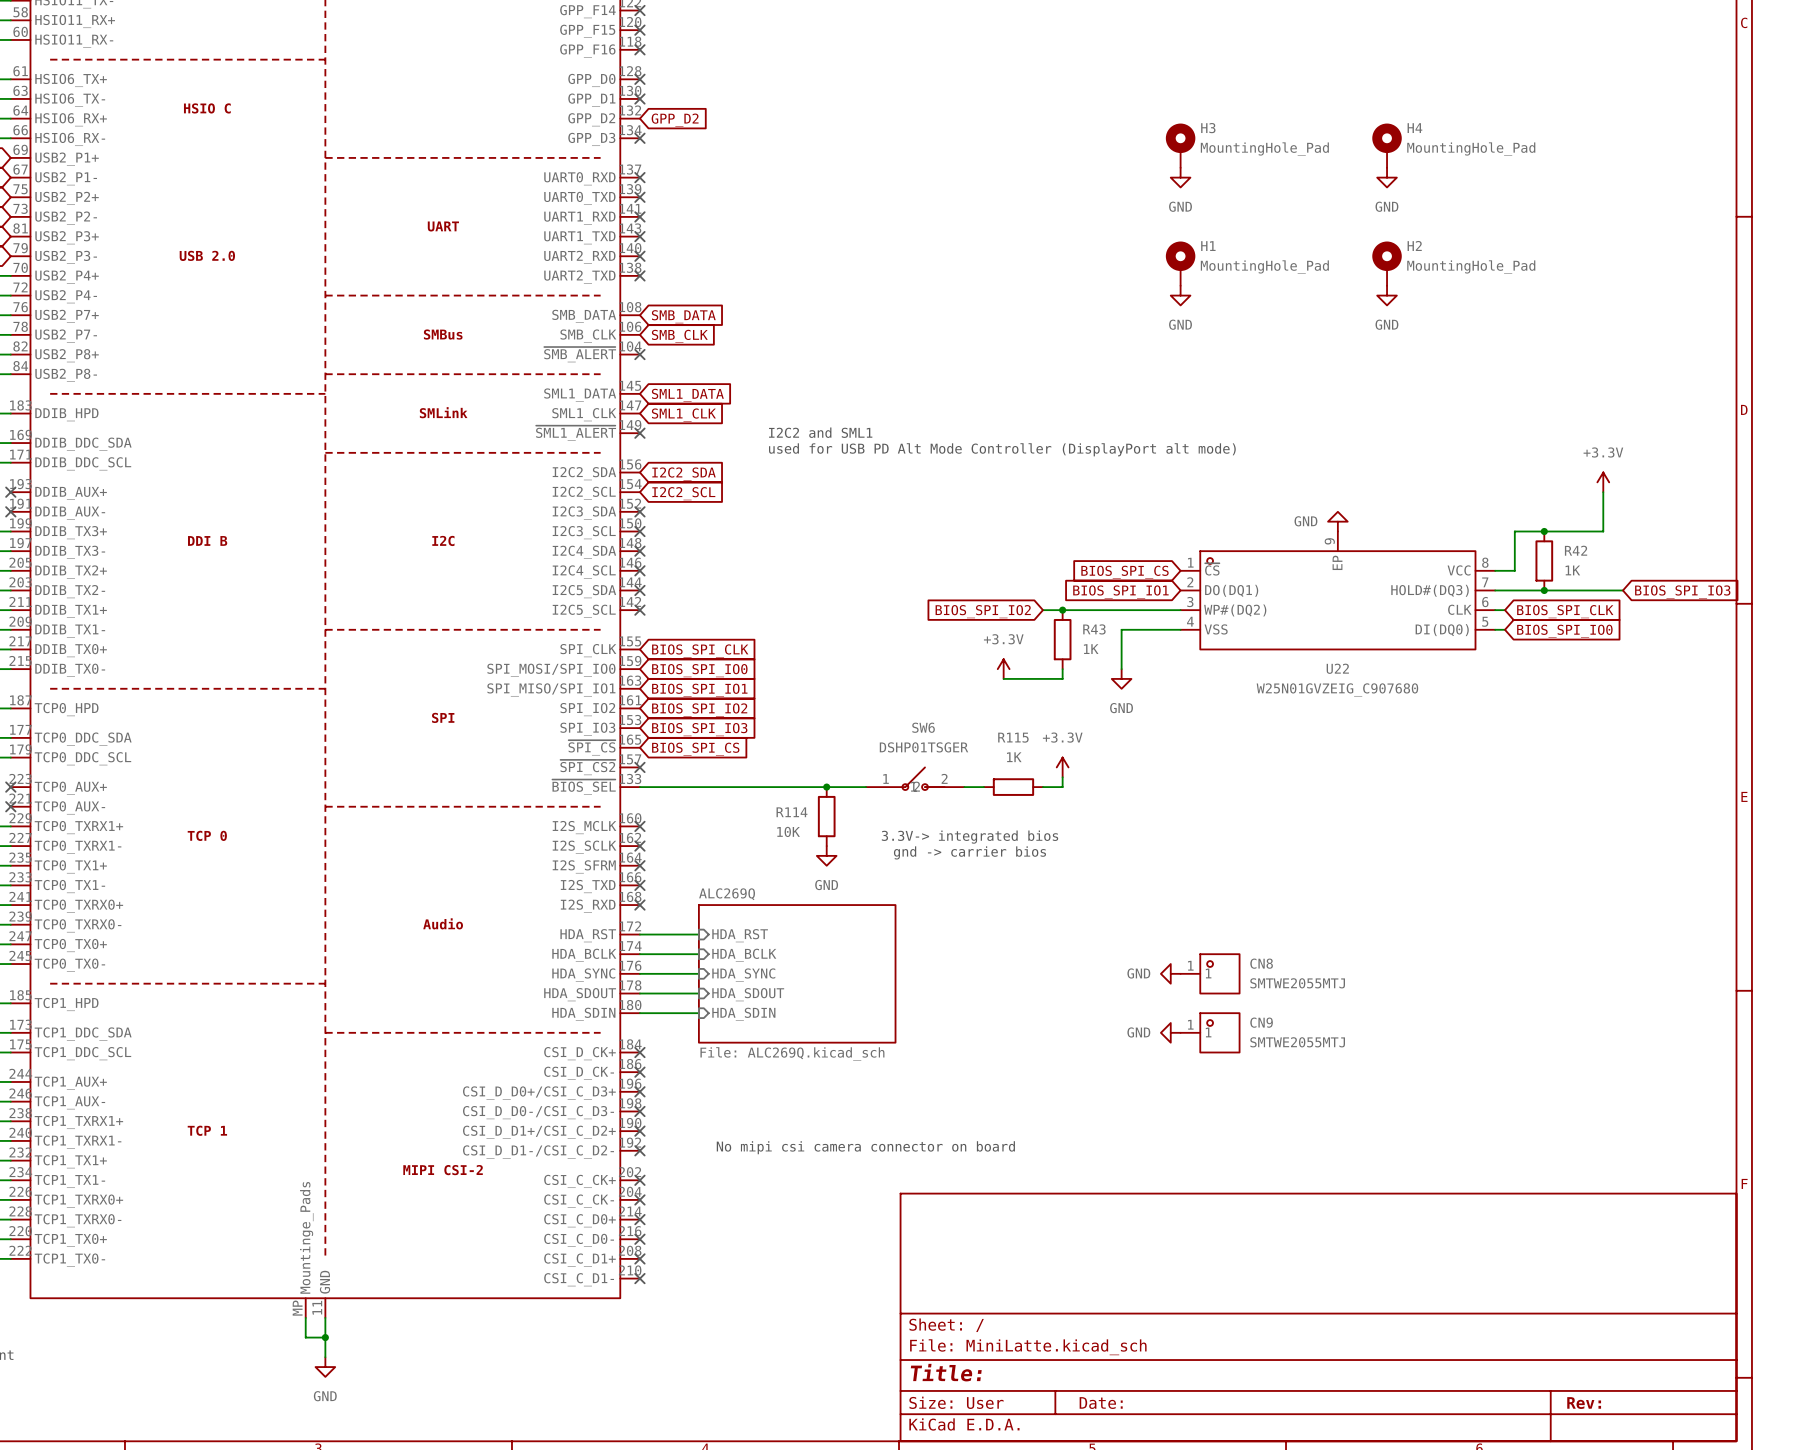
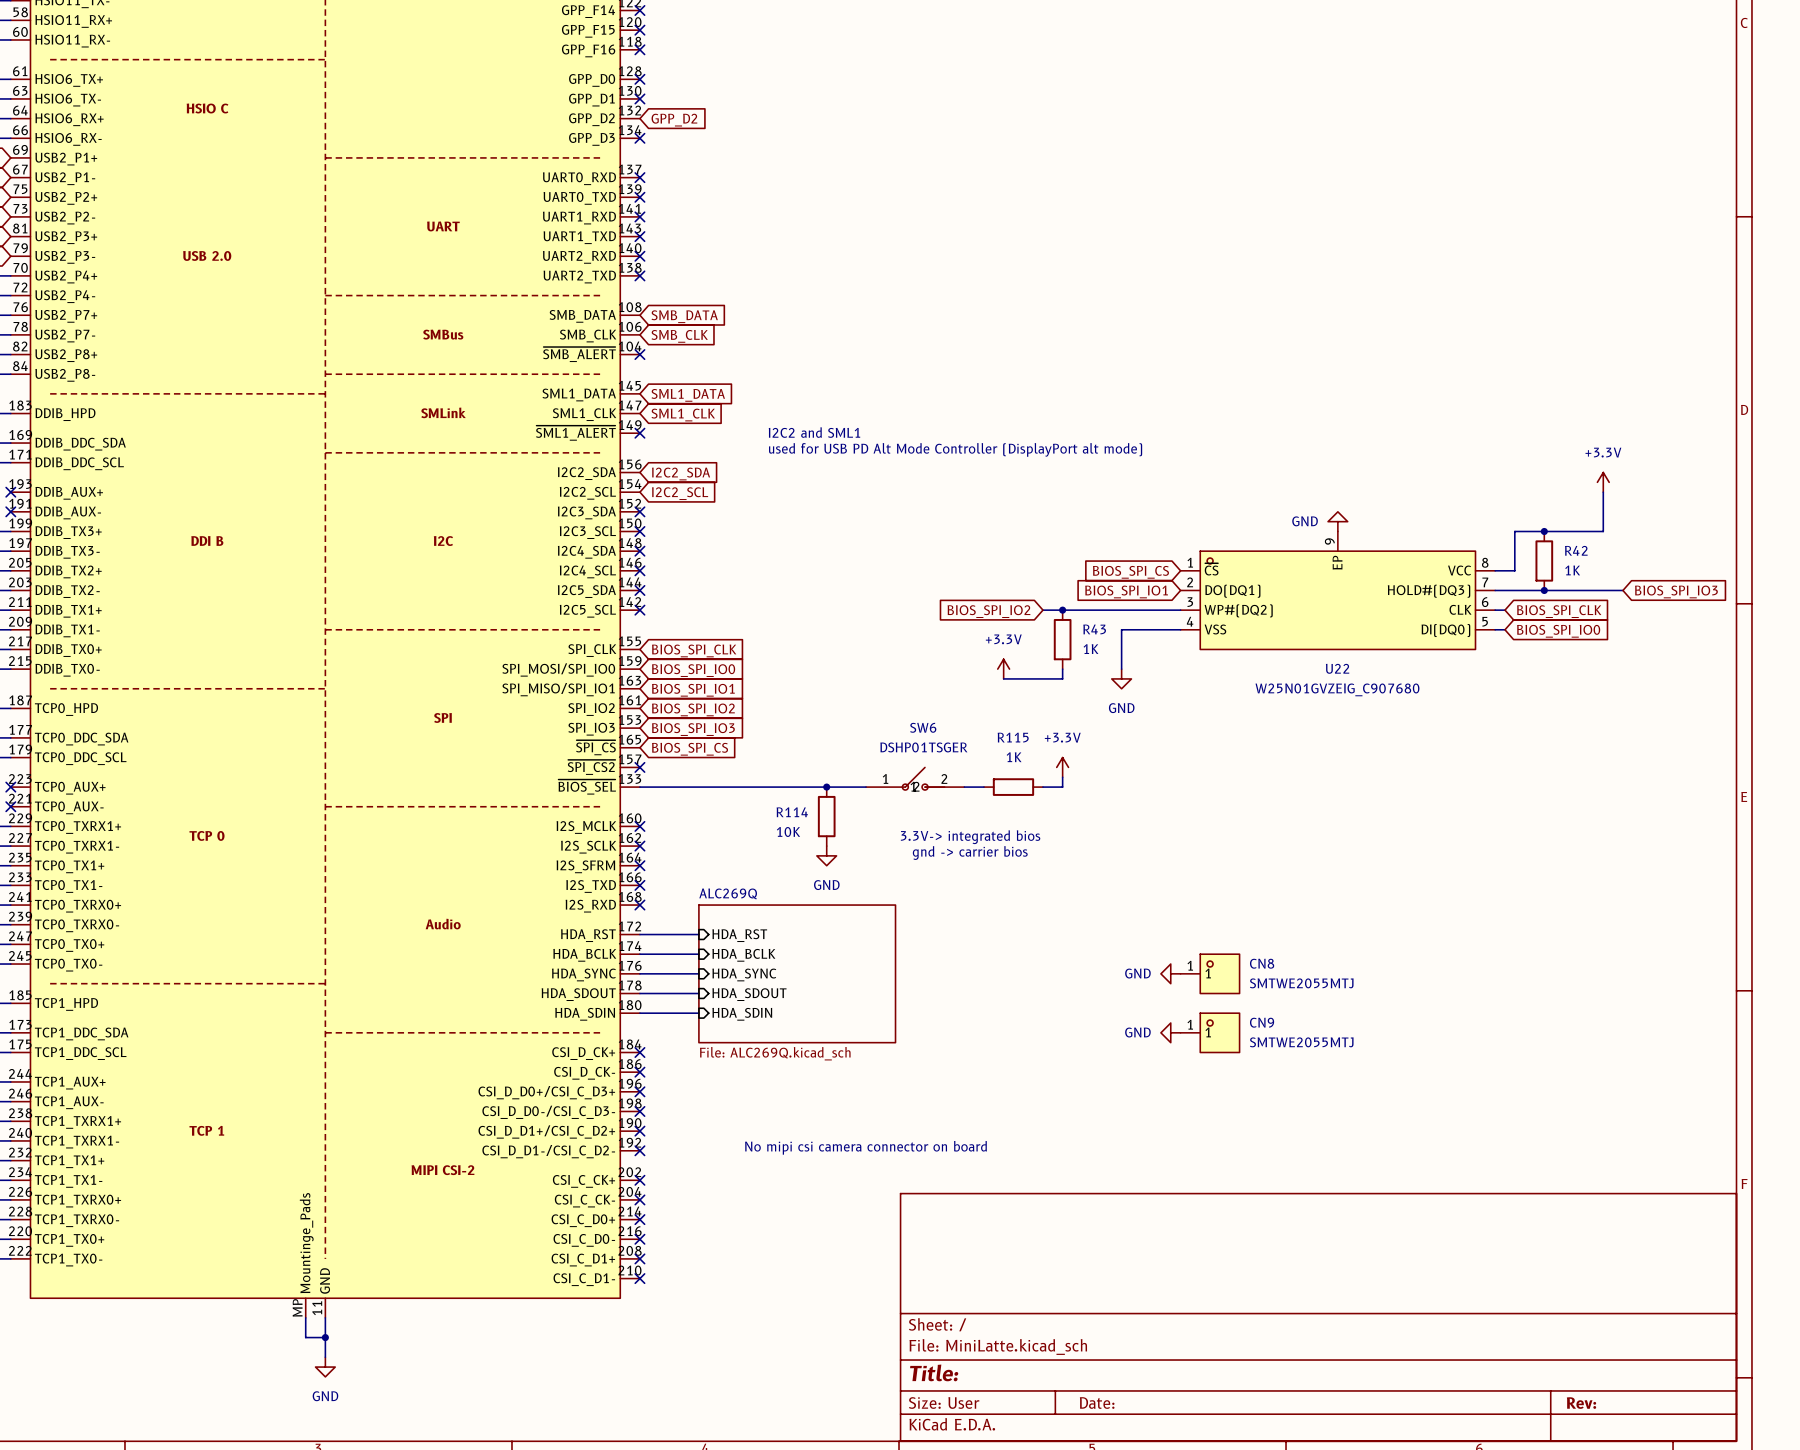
H3: MountingHole_Pad (1180, 145) -> none
H4: MountingHole_Pad (1387, 145) -> none
power symbol: GND (1180, 177) -> none
power symbol: GND (1387, 177) -> none
H1: MountingHole_Pad (1180, 263) -> none
H2: MountingHole_Pad (1387, 263) -> none
power symbol: GND (1180, 295) -> none
power symbol: GND (1387, 295) -> none

